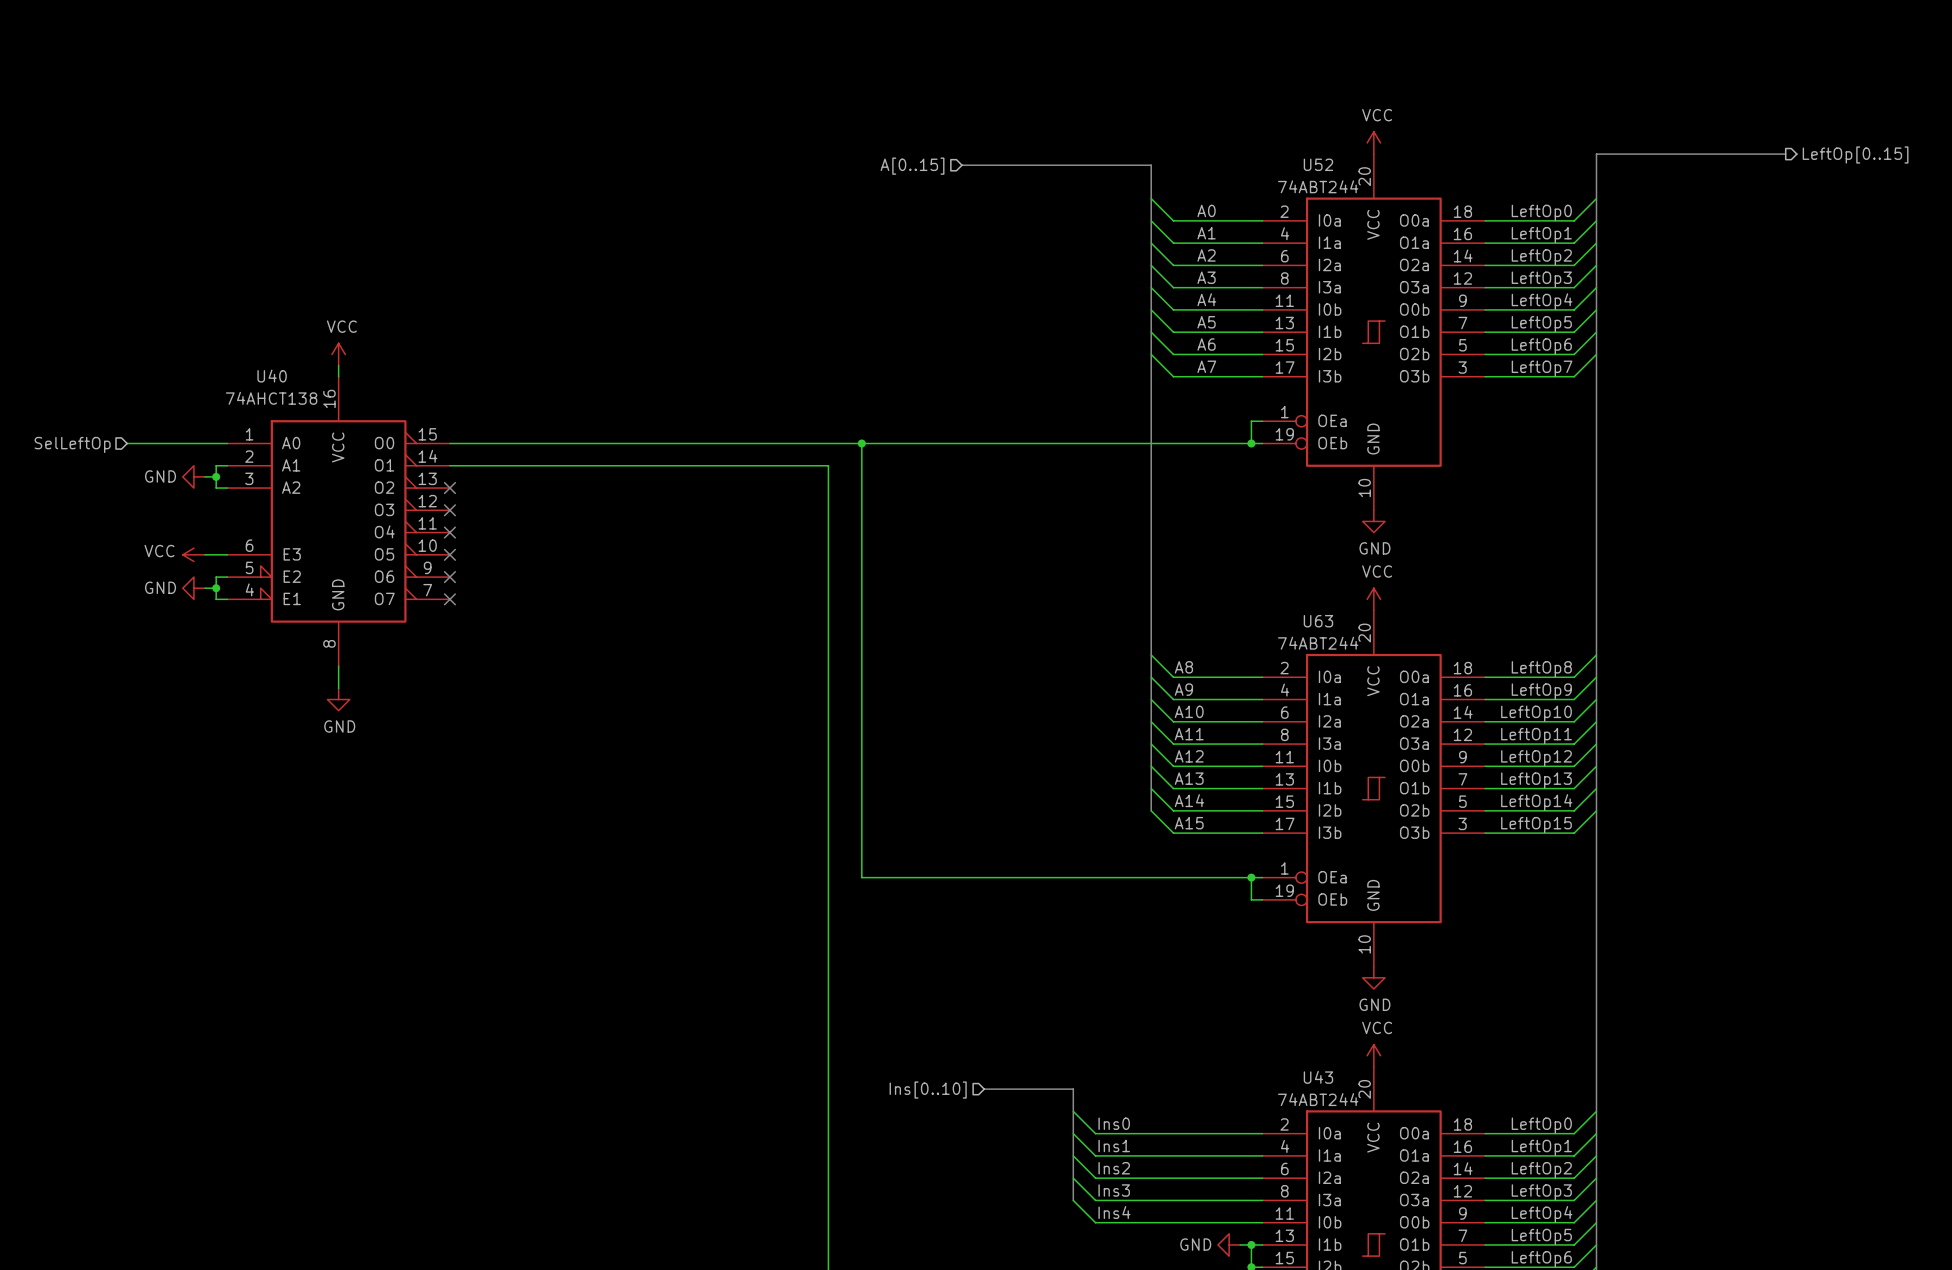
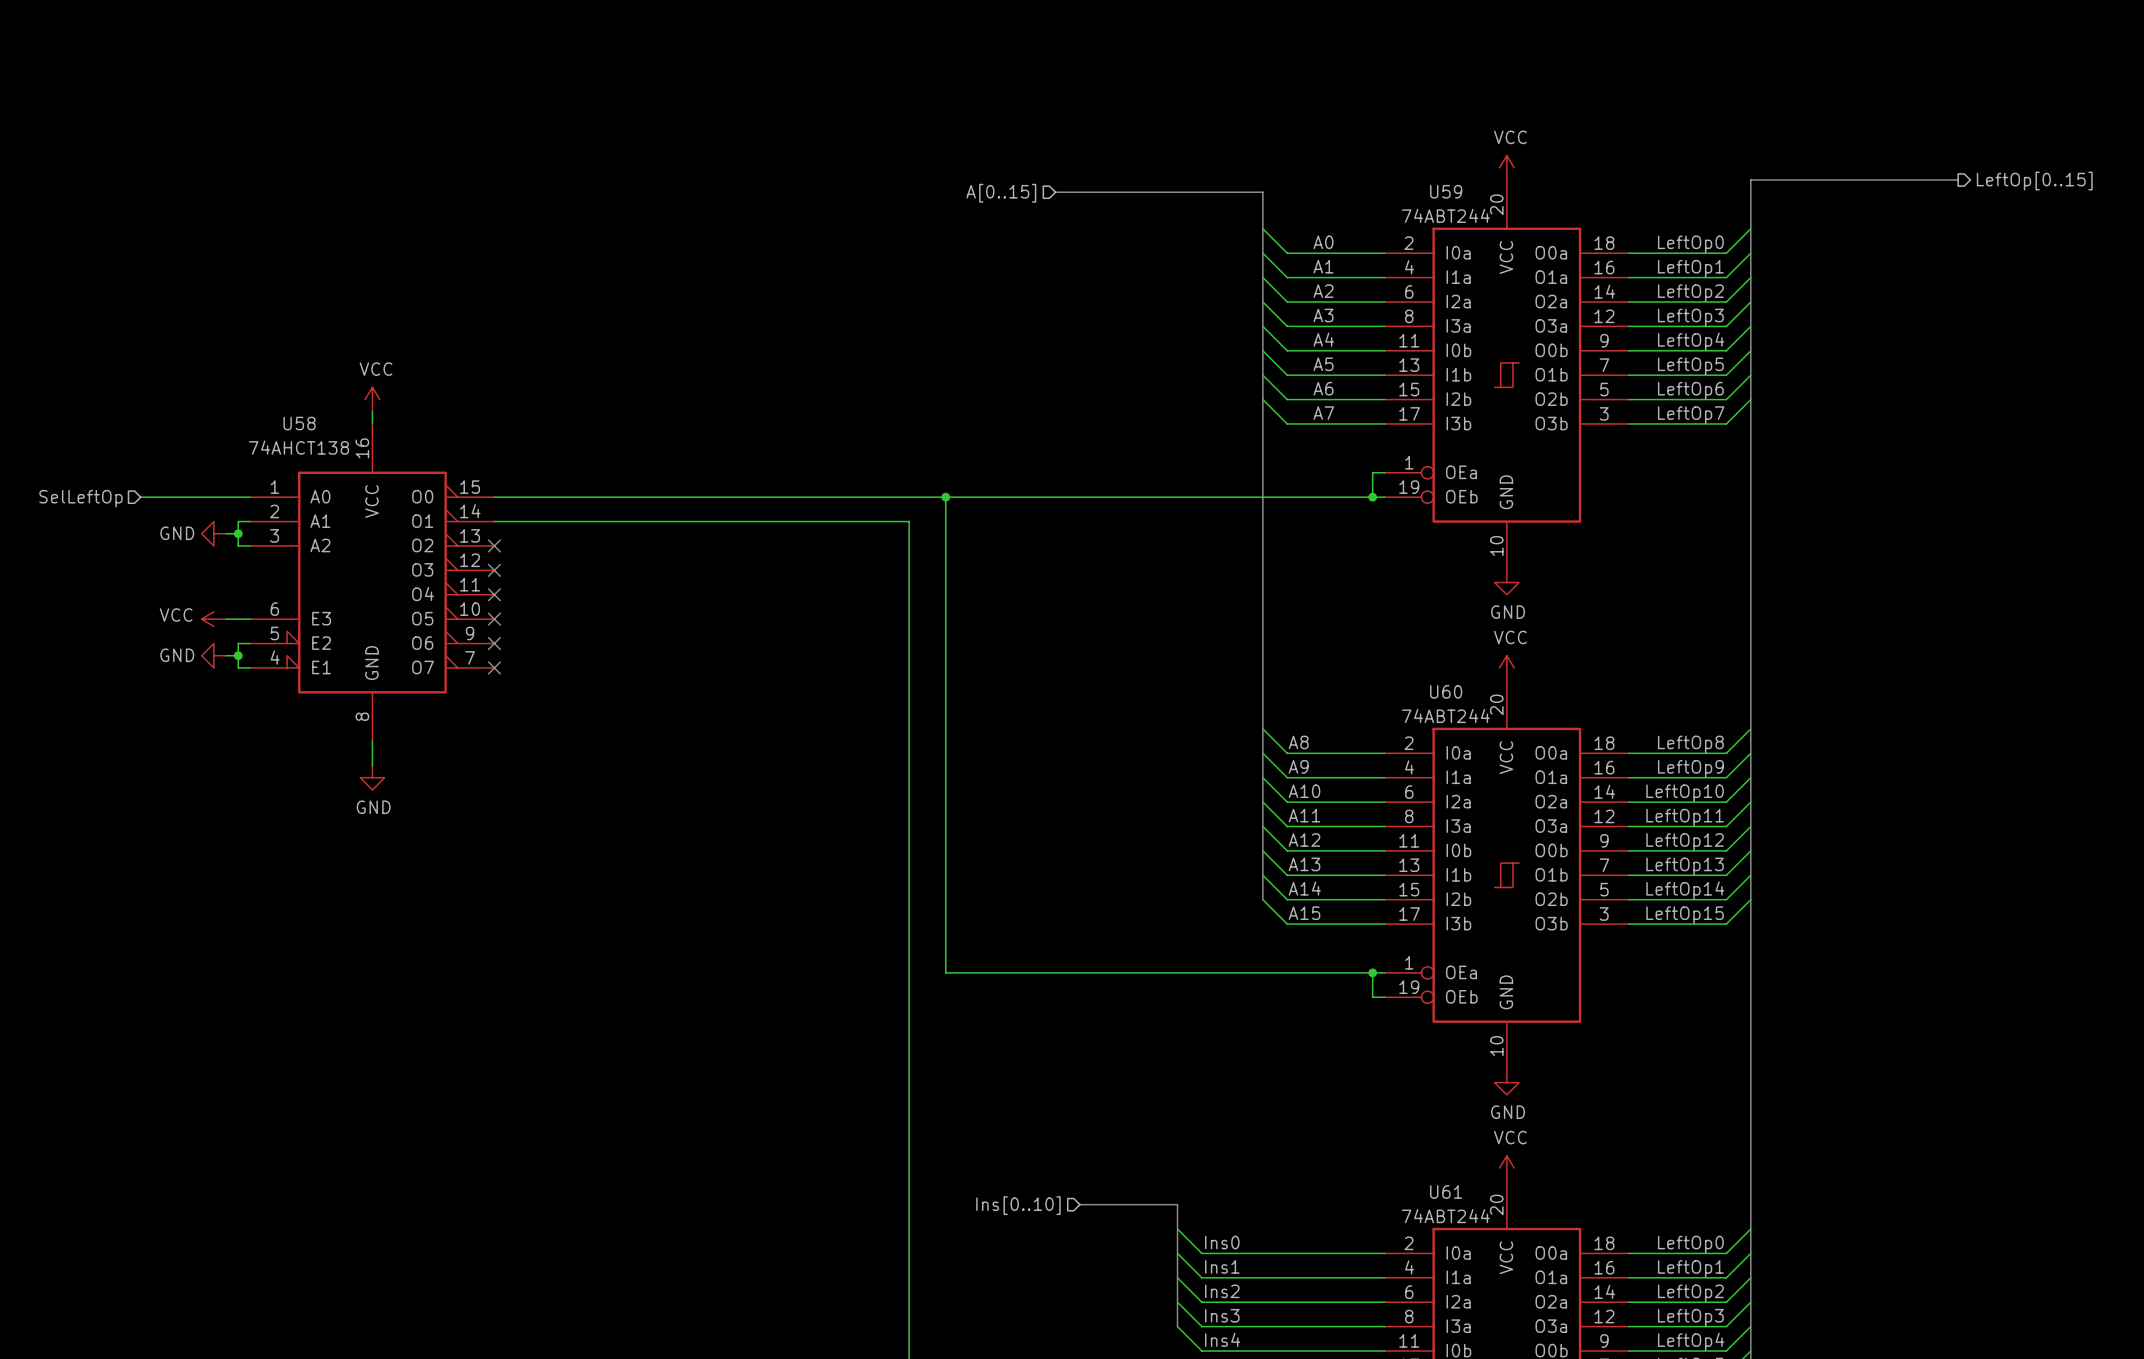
U52 name: U52 (1318, 164) -> U59 (1446, 191)
U40 name: U40 (272, 376) -> U58 (299, 423)
U63 name: U63 (1318, 621) -> U60 (1446, 691)
U43 name: U43 (1318, 1077) -> U61 (1446, 1191)

